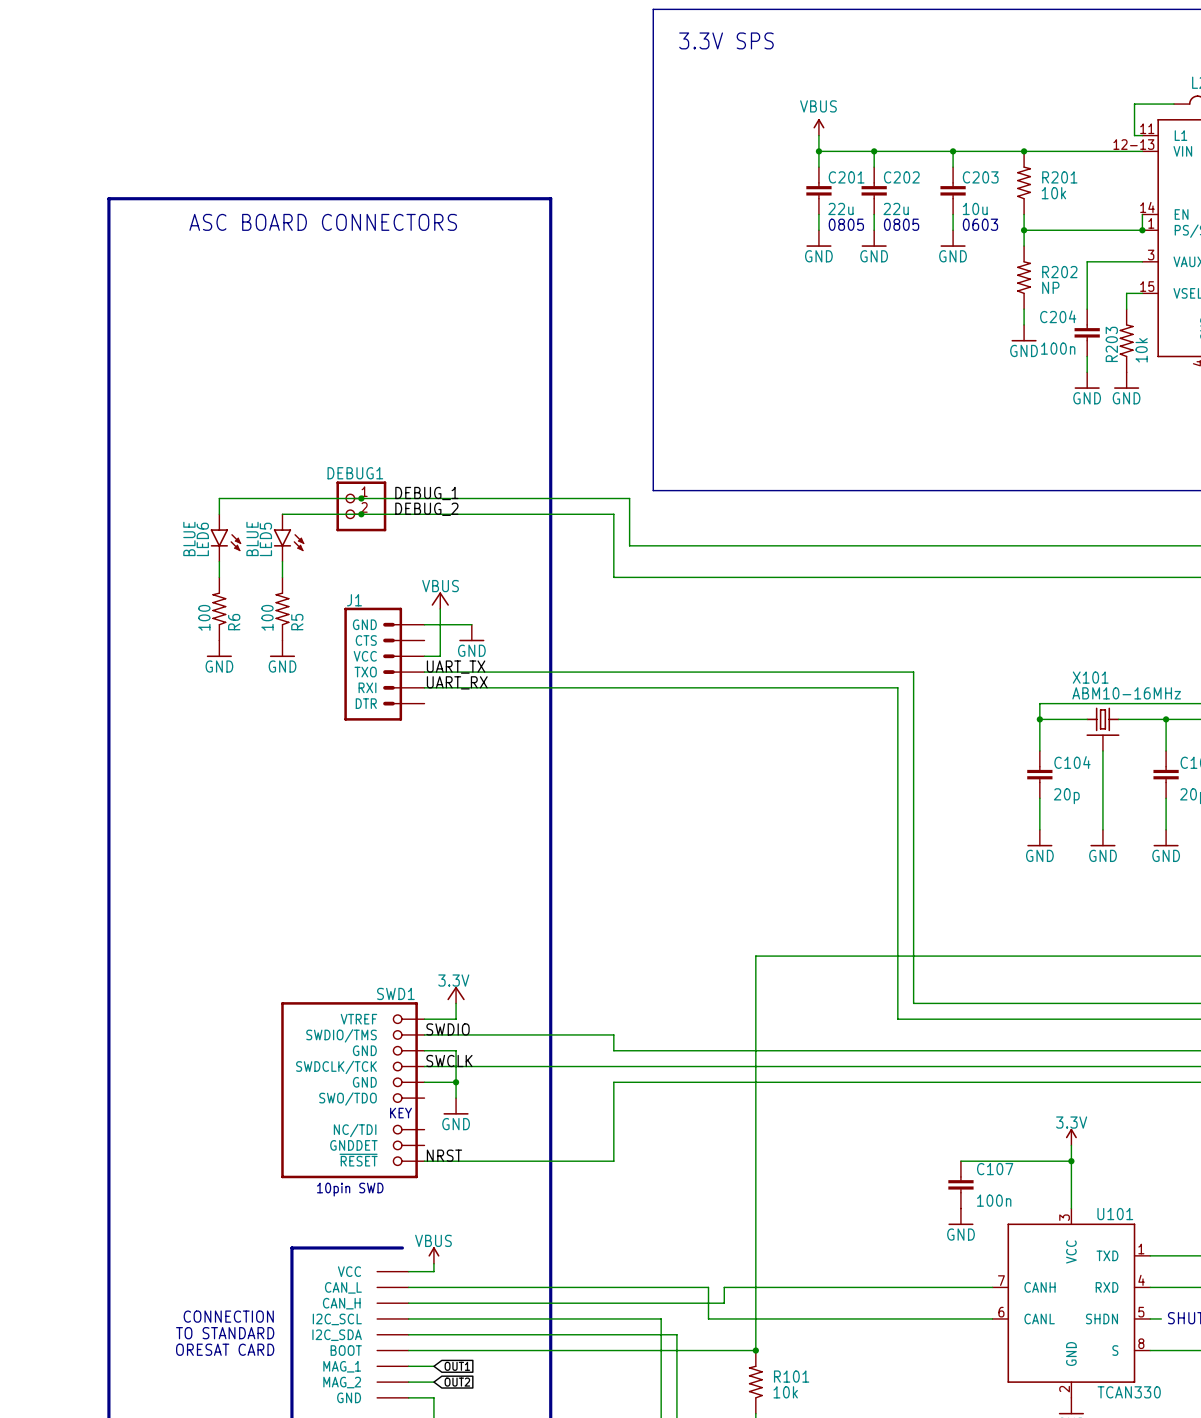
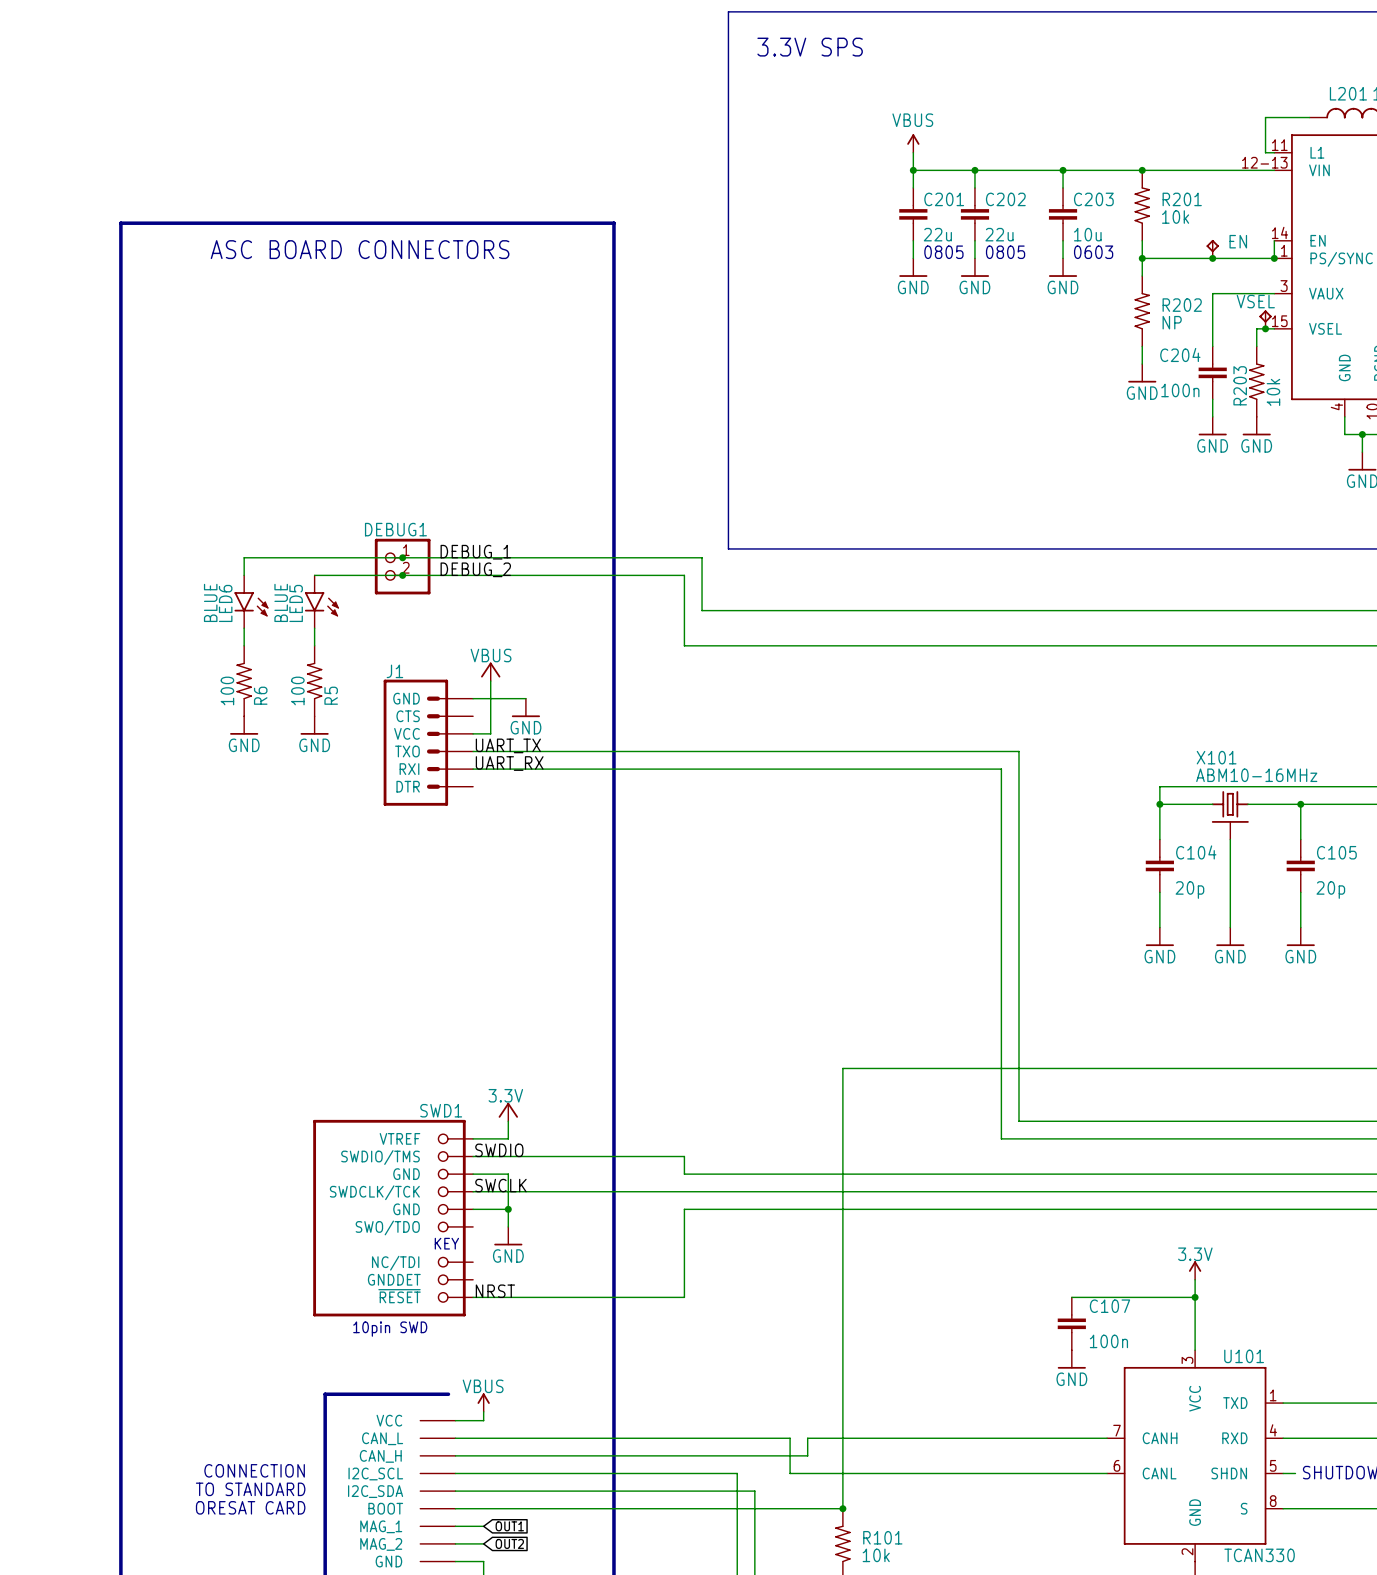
EN: none -> (1212, 249)
junction: none -> (1212, 258)
VSEL: none -> (1265, 319)
junction: none -> (1265, 328)

